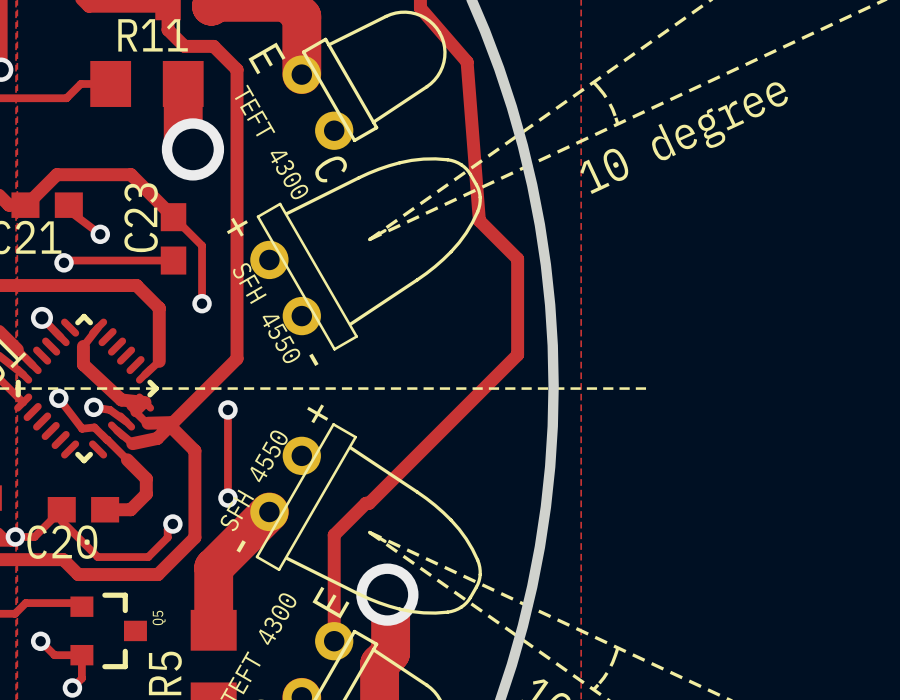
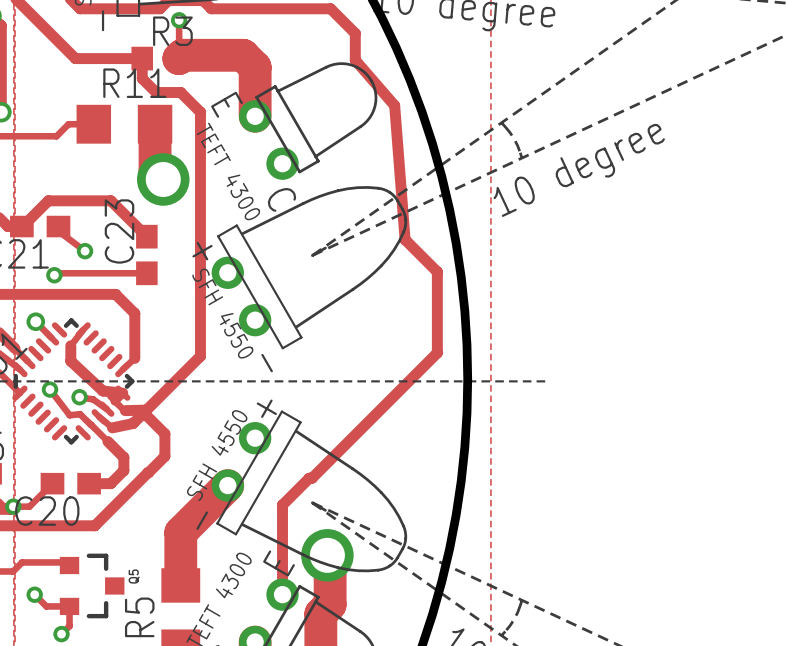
track: (173, 217) (202, 245) (202, 303) -> none
via: (202, 303) -> none
track: (227, 409) (227, 498) -> none
via: (227, 409) -> none
track: (194, 477) (194, 537) (157, 574) (78, 574) (63, 559) -> (164, 456) (94, 525) (53, 525)
via: (227, 498) -> none
track: (61, 509) (61, 521) (97, 557) (148, 557) (167, 537) (167, 529) (172, 524) -> none
via: (172, 524) -> none

